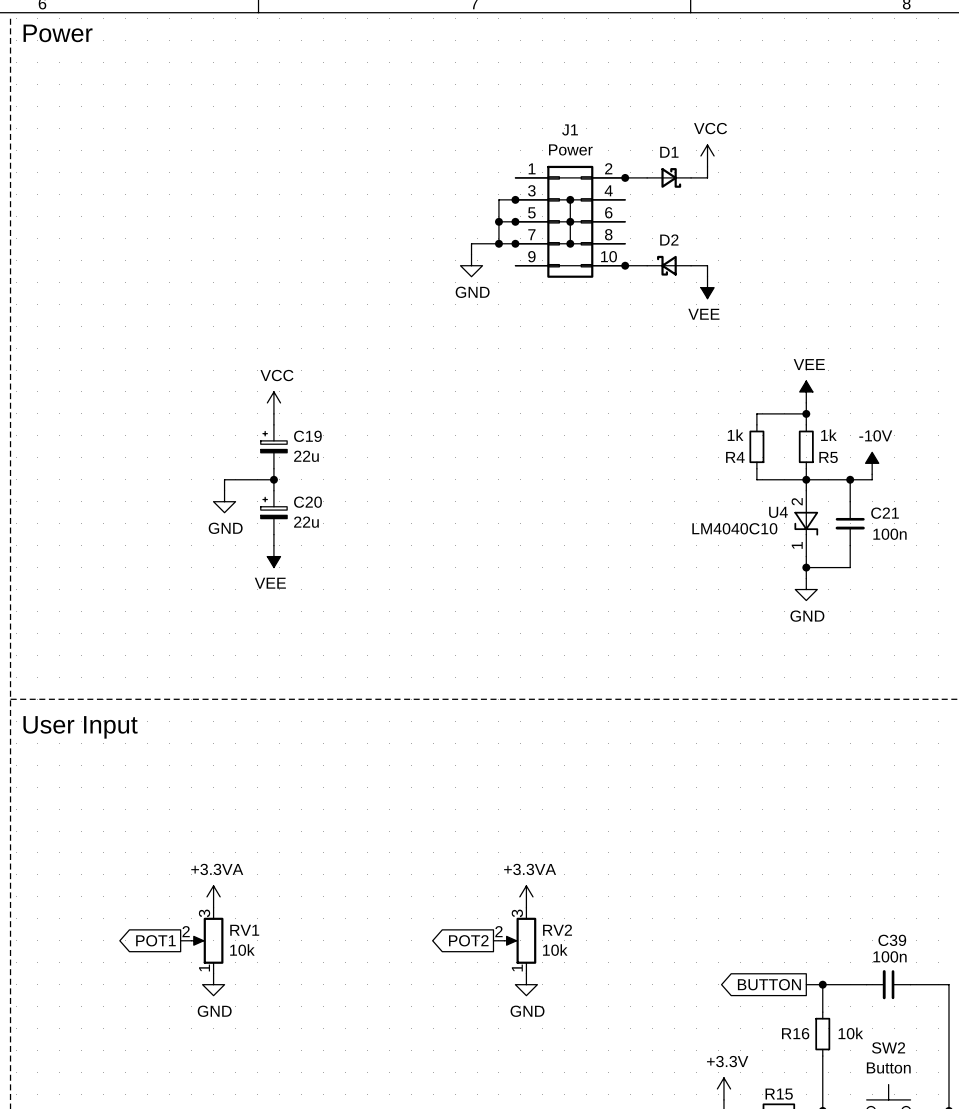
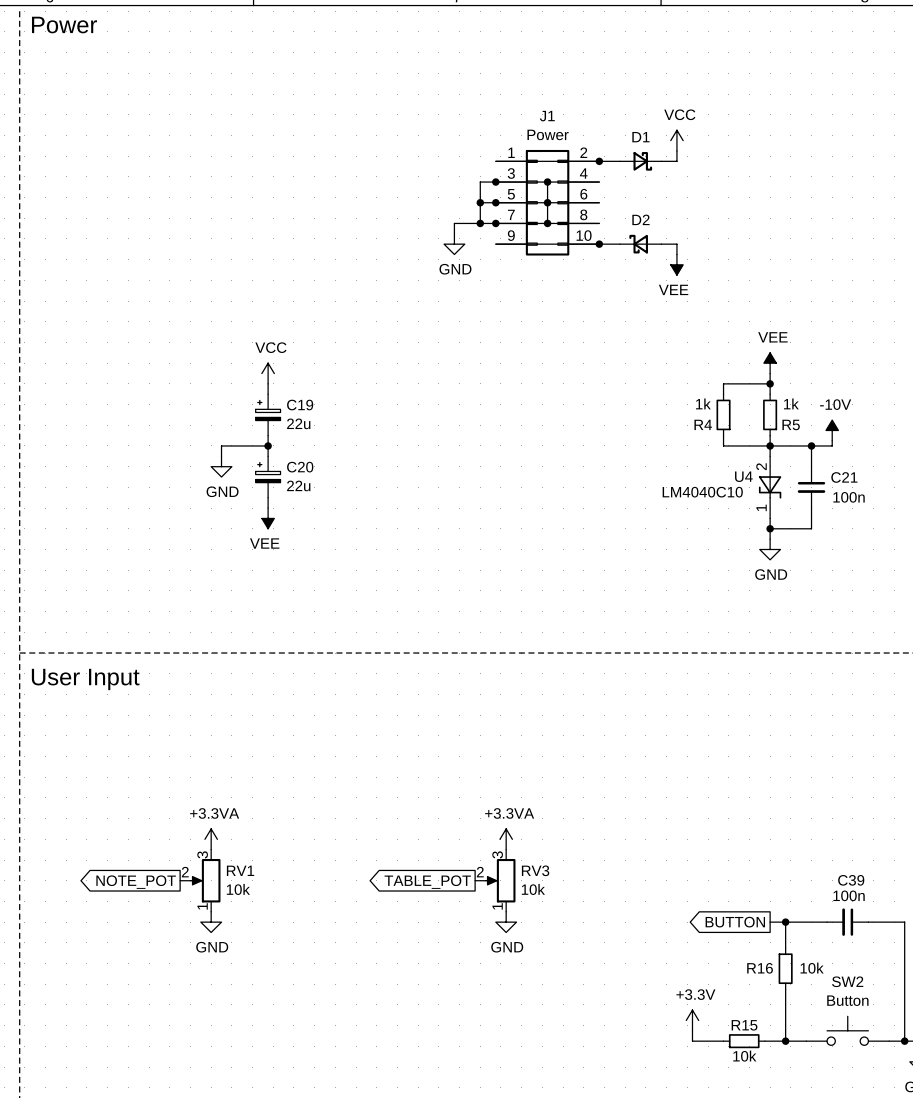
RV2 name: RV2 (557, 930) -> RV3 (535, 870)
global label: POT1 (155, 940) -> NOTE_POT (136, 882)
global label: POT2 (468, 940) -> TABLE_POT (427, 882)

